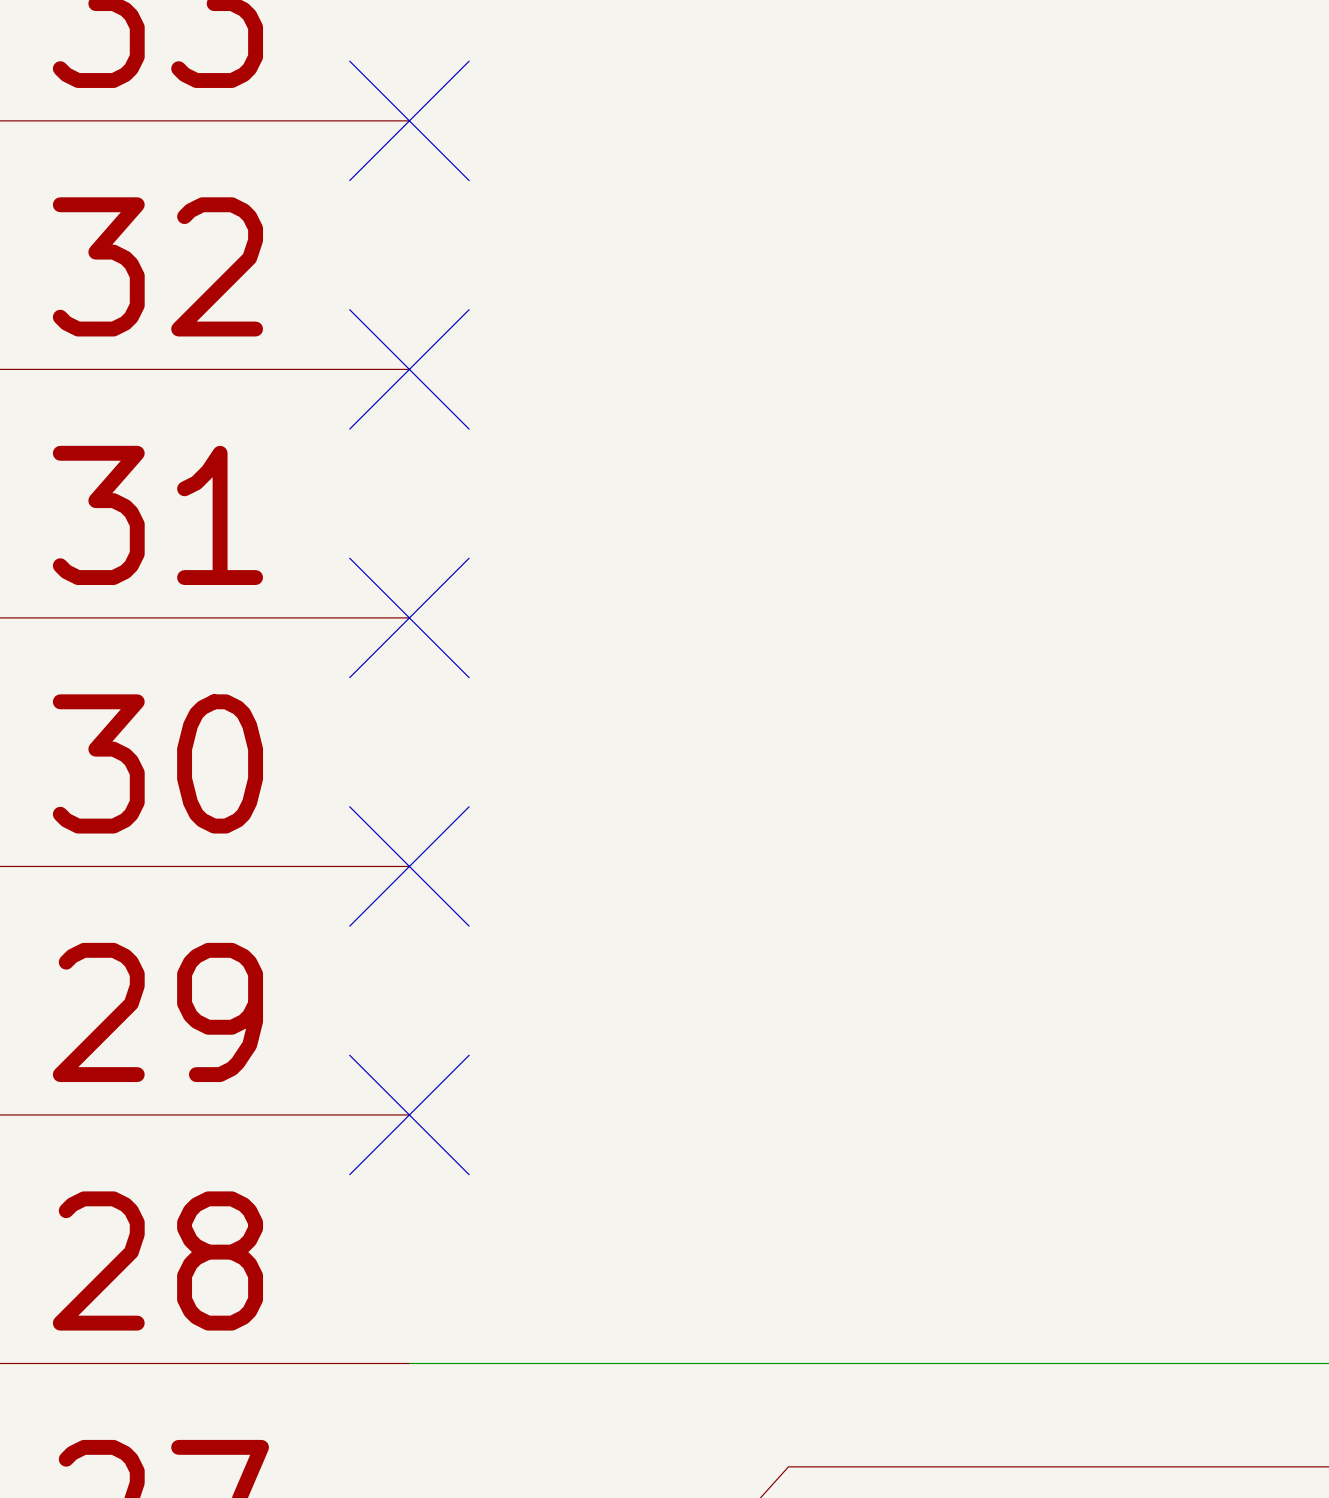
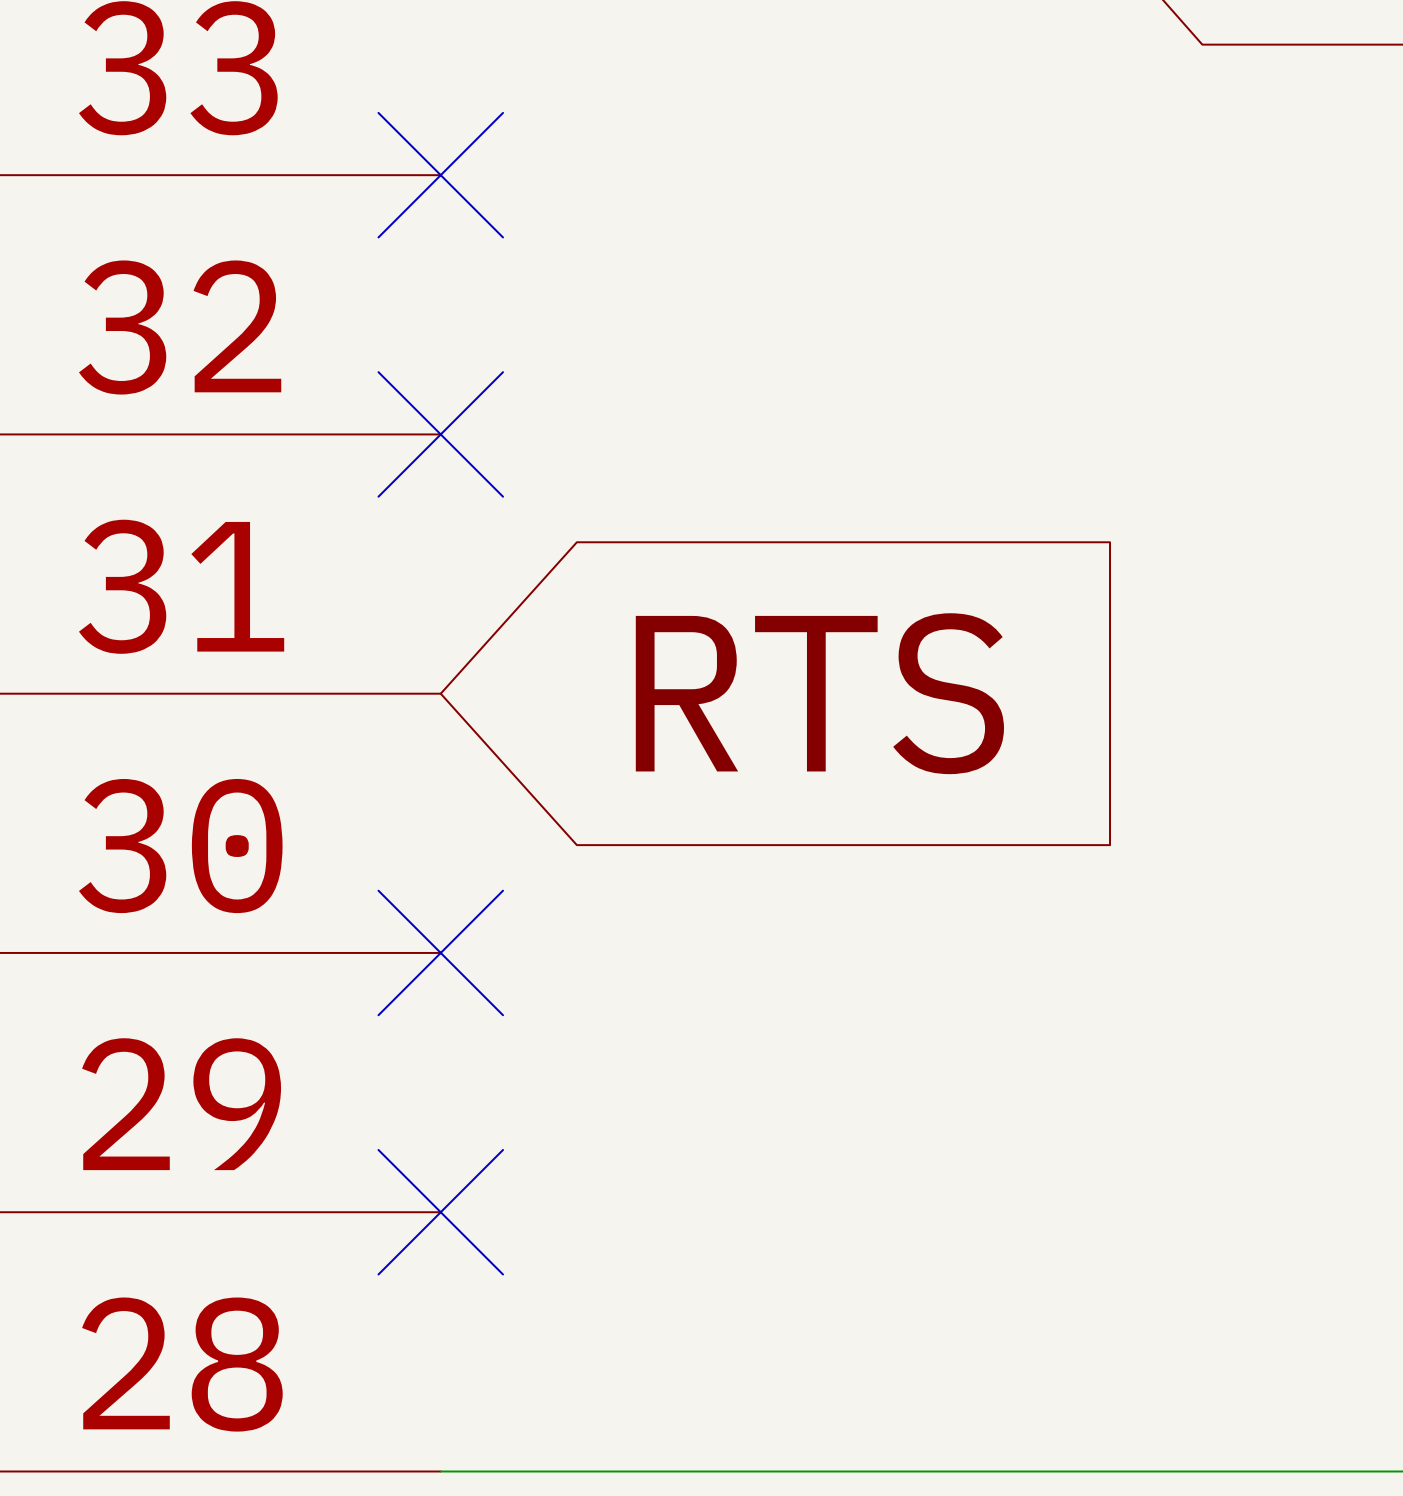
no-connect mark: (409, 617) -> none
global label: none -> RTS (819, 693)

